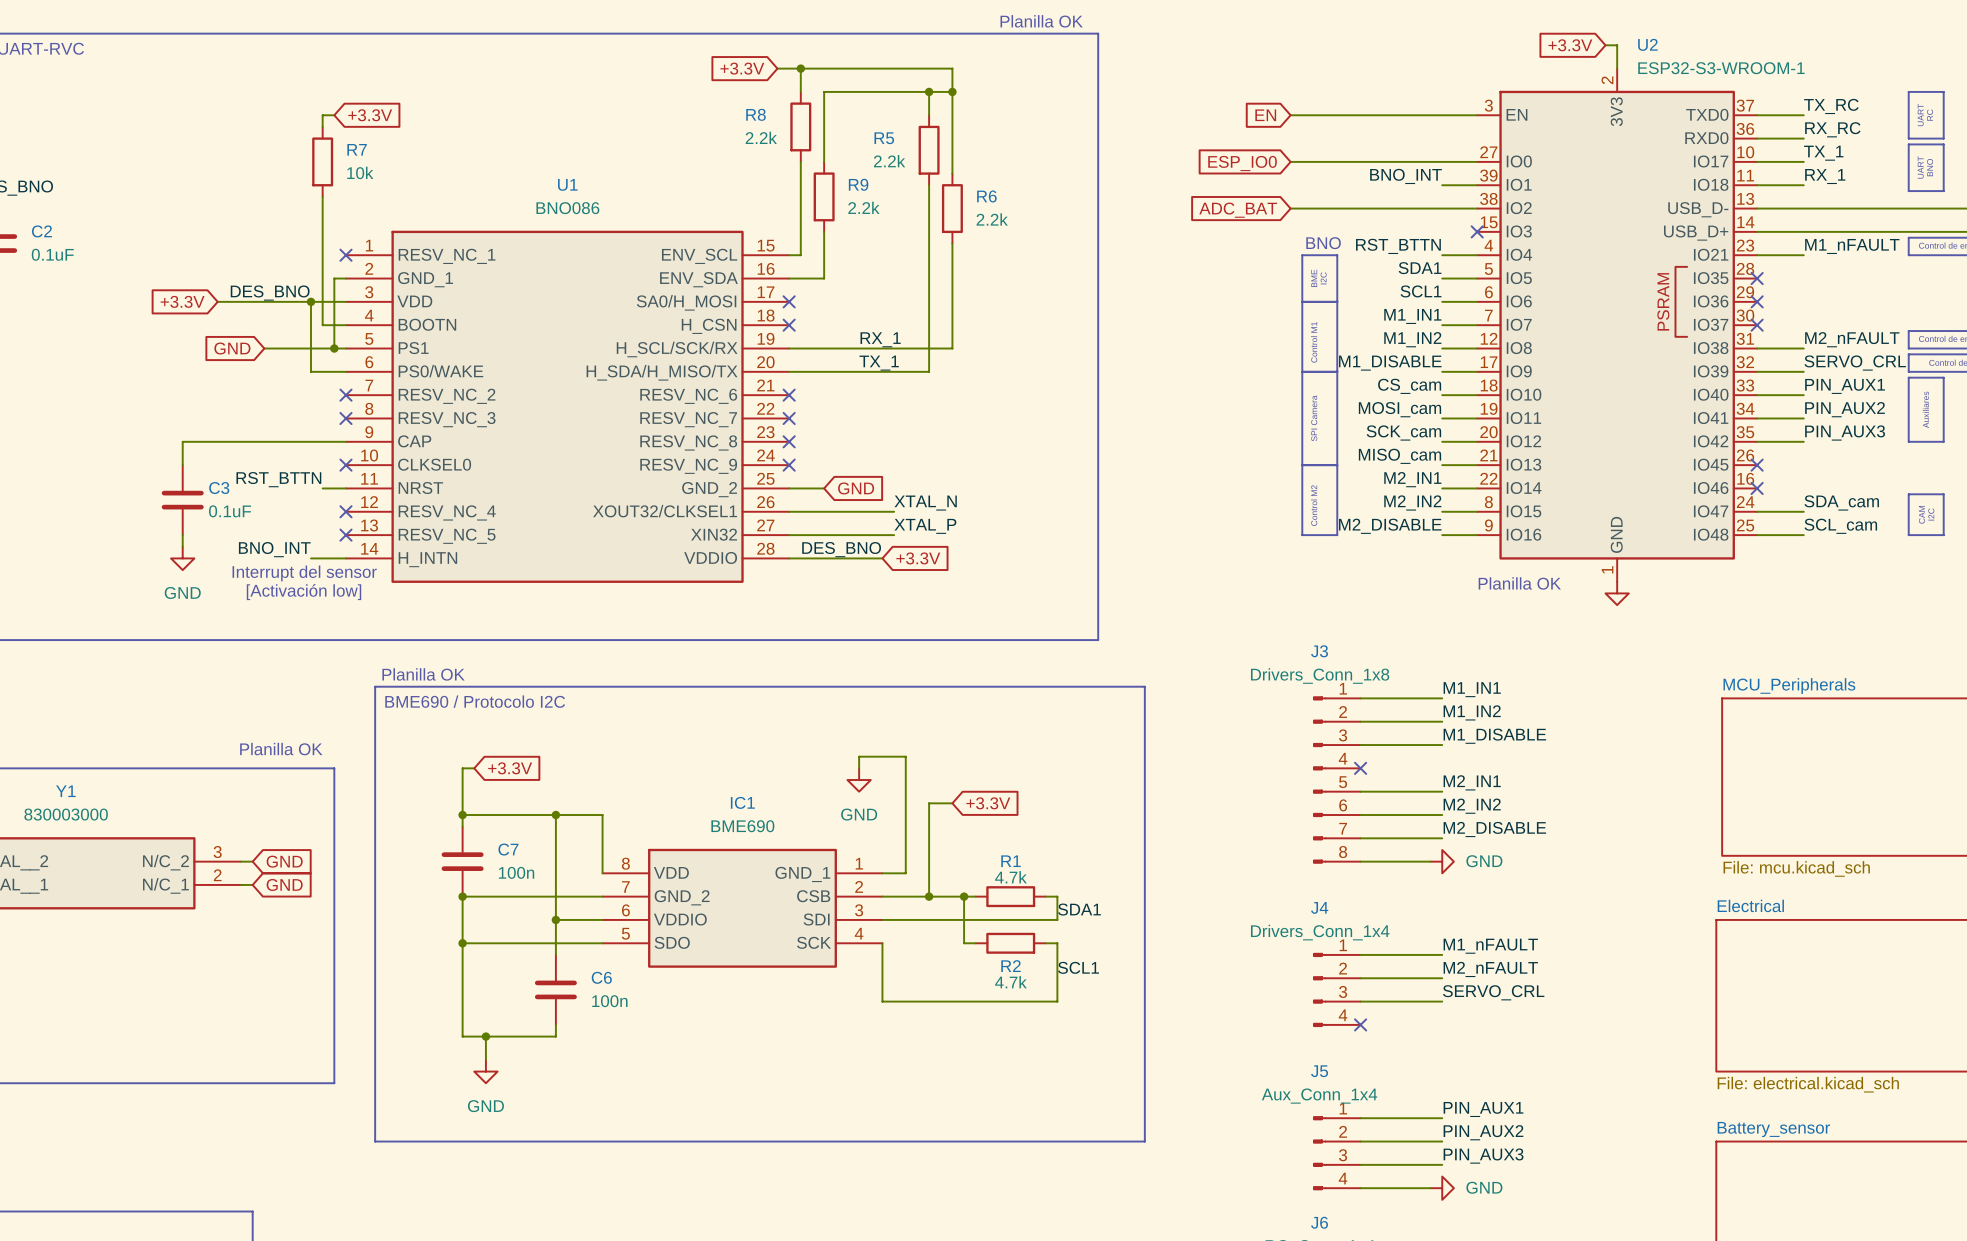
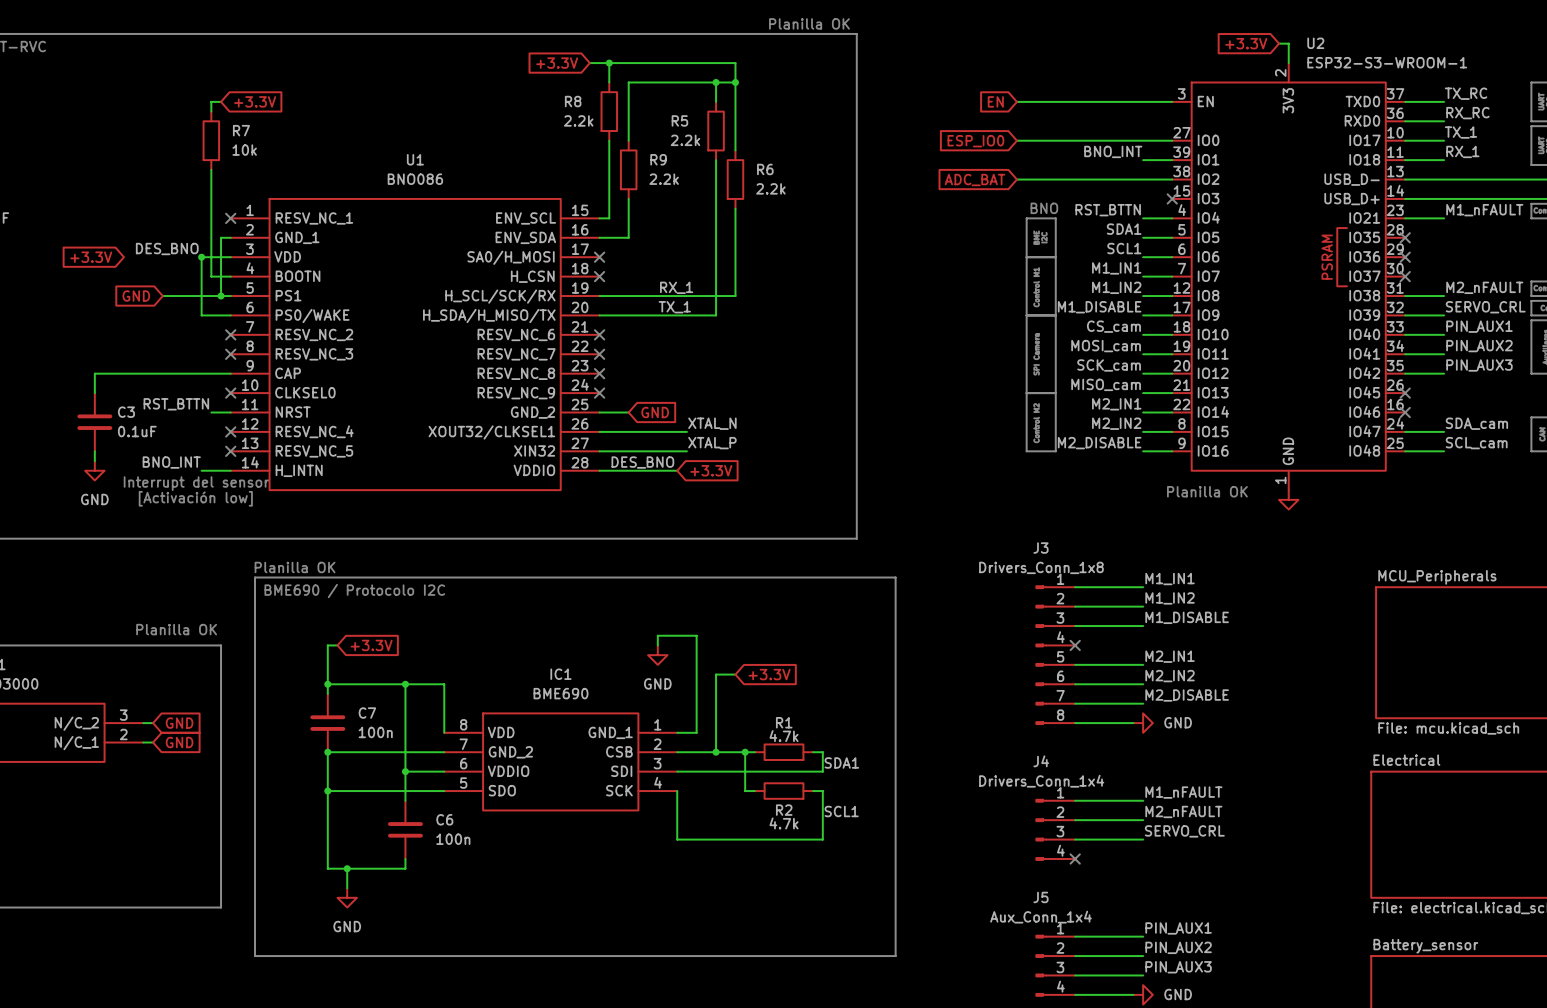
wire: (217, 301) (311, 301) -> none

